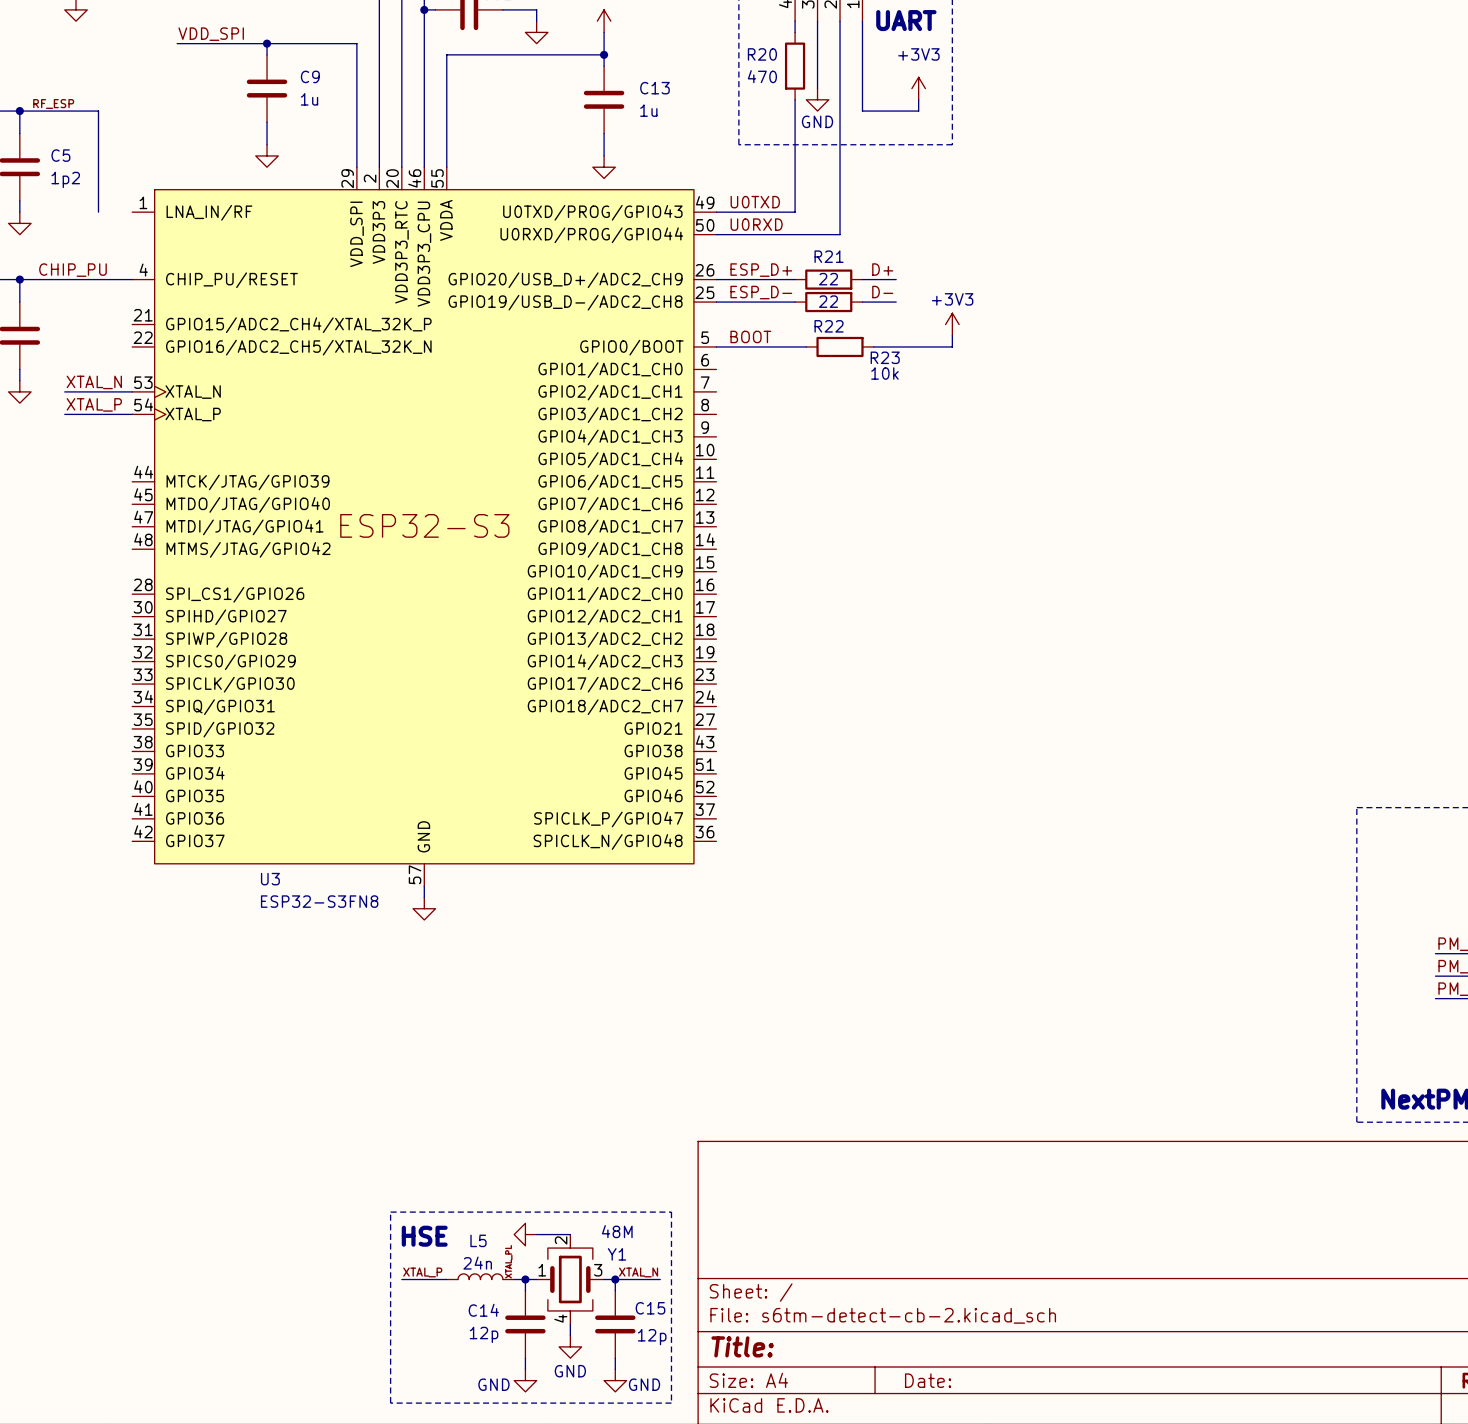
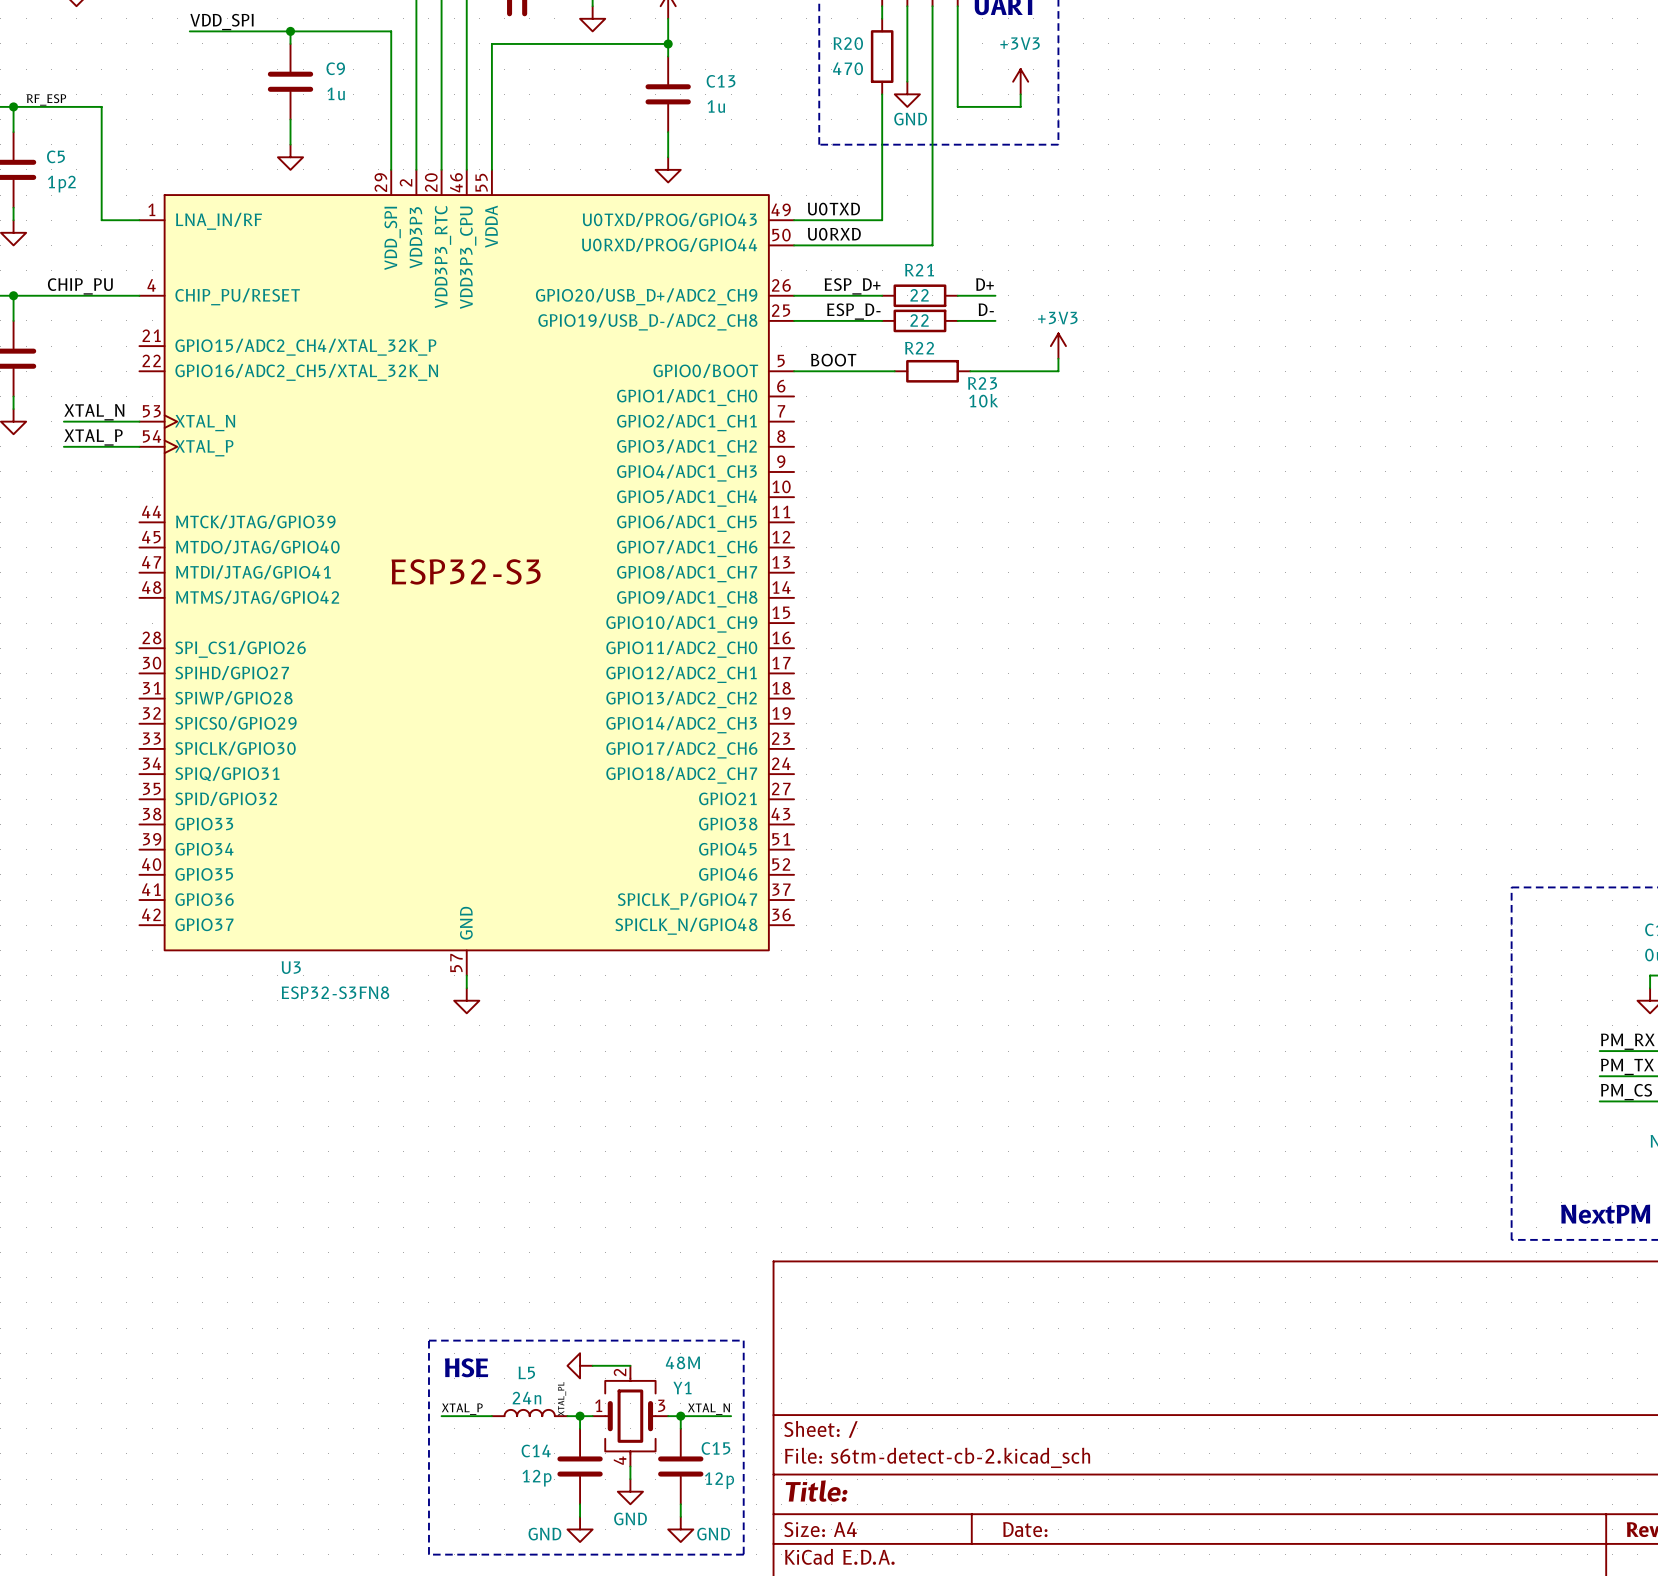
wire: none -> (101, 220) (139, 220)

